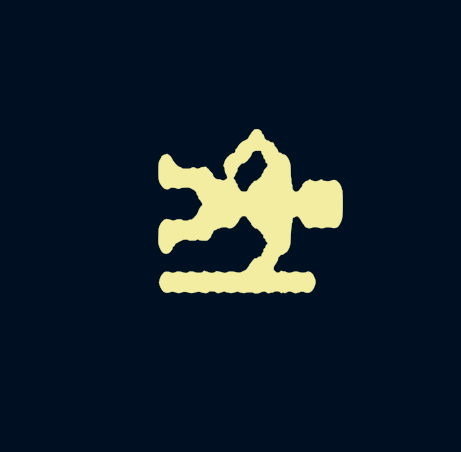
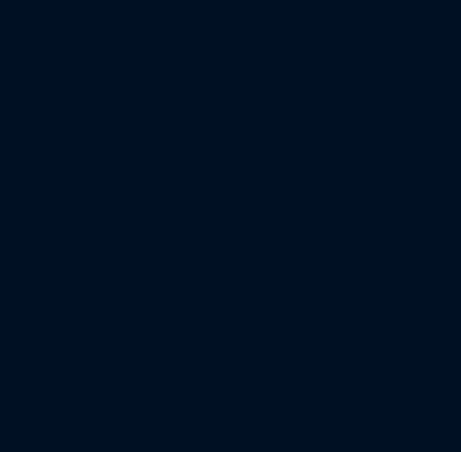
drawing: [158, 129, 343, 294] -> none

